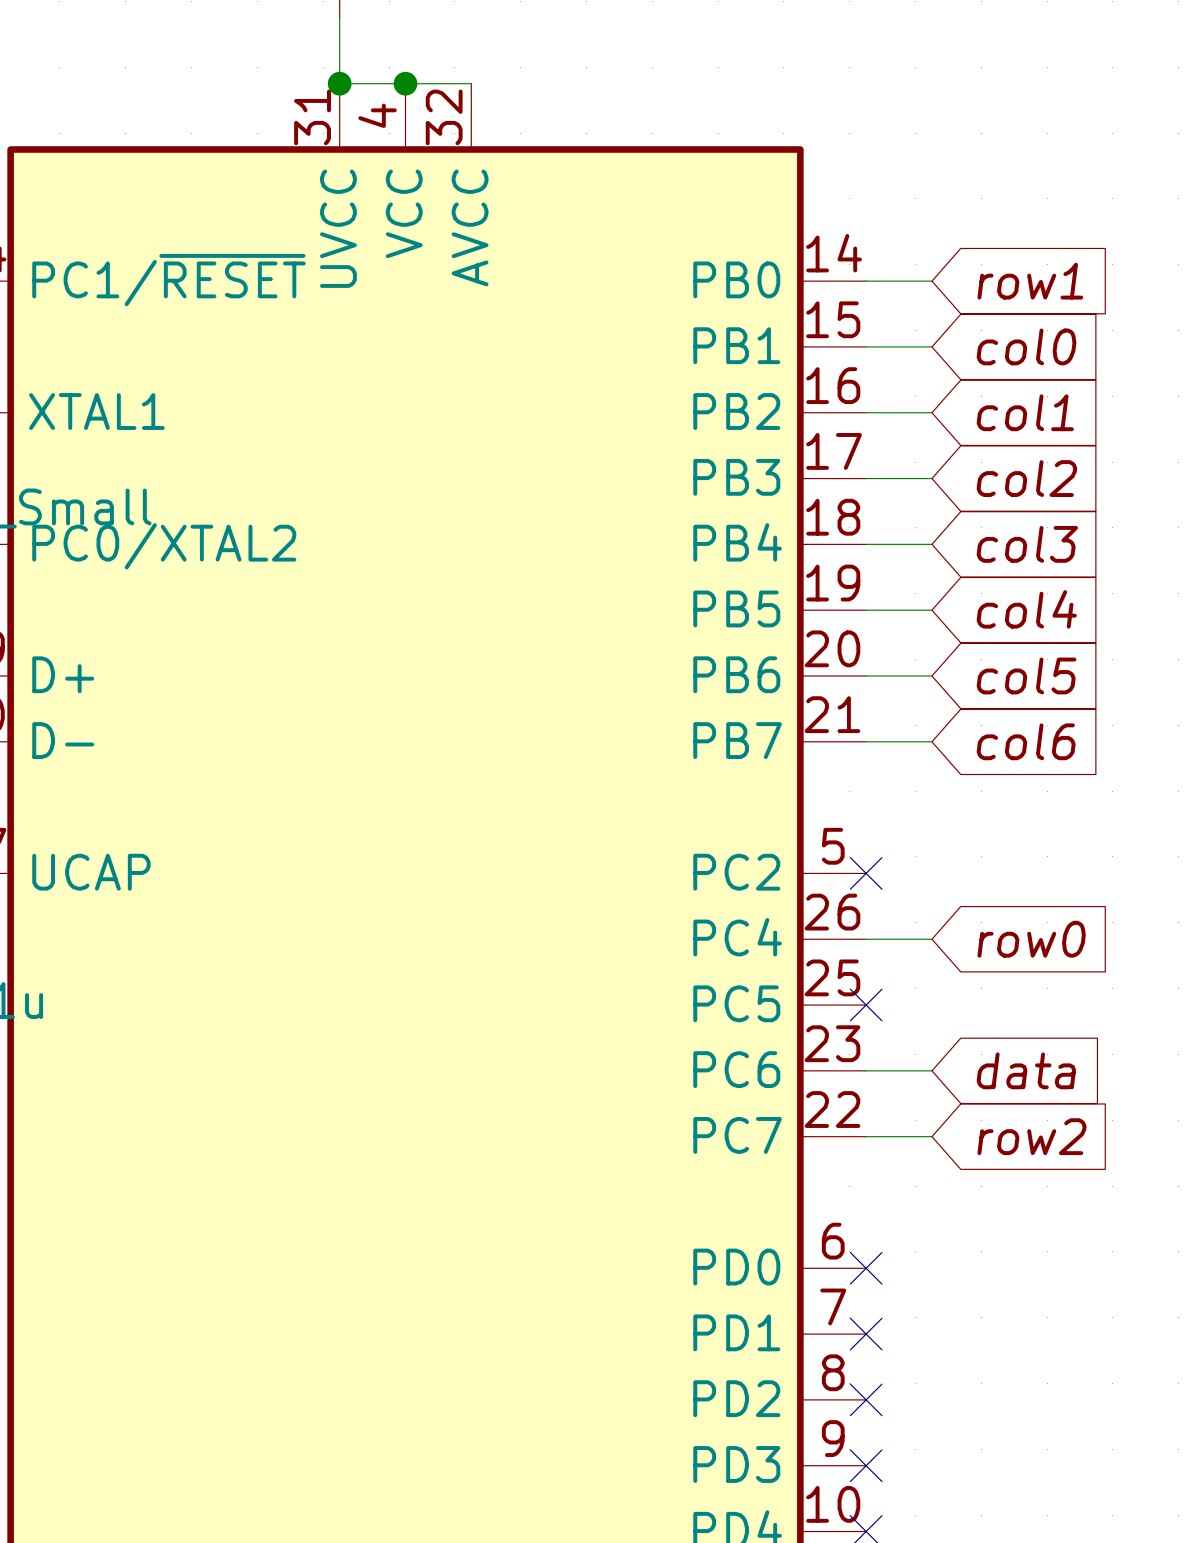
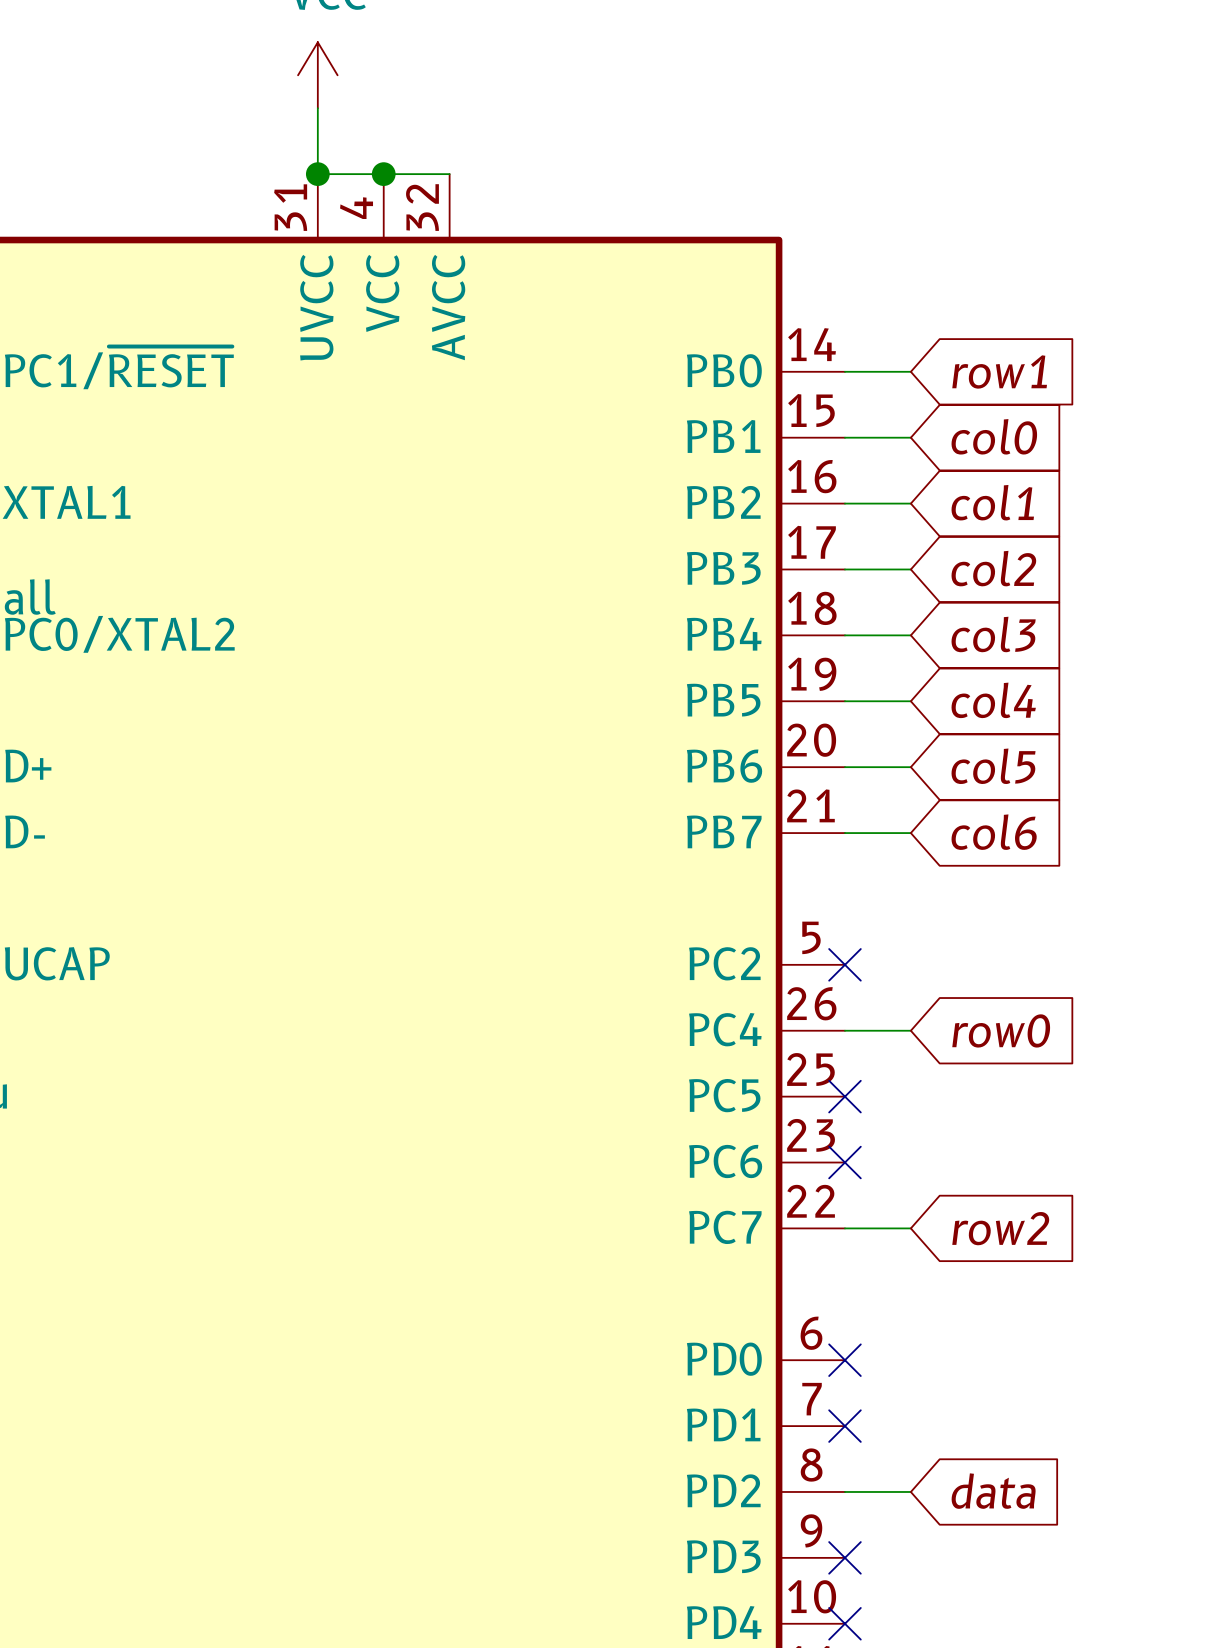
wire: (866, 1070) (931, 1070) -> (844, 1491) (910, 1491)
no-connect mark: none -> (844, 1162)
global label position: data (1026, 1070) -> data (993, 1491)
no-connect mark: (866, 1399) -> none

